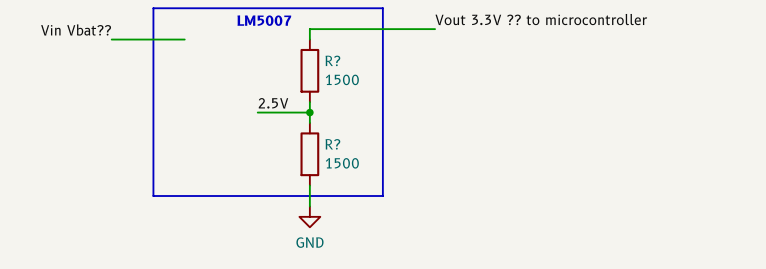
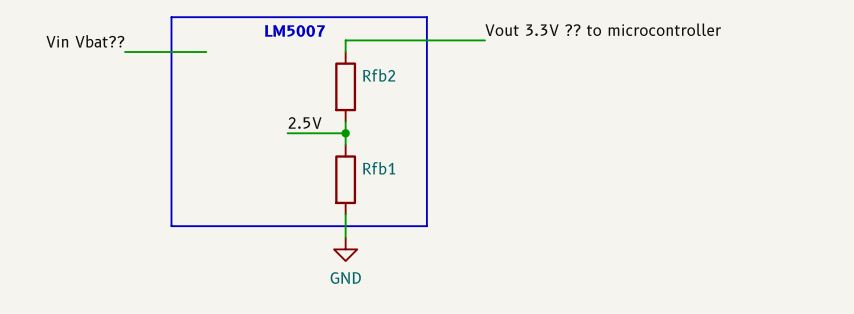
R? name: R? (332, 60) -> Rfb2 (379, 75)
R? value: 1500 (342, 79) -> none
R? name: R? (332, 144) -> Rfb1 (379, 168)
R? value: 1500 (342, 163) -> none

